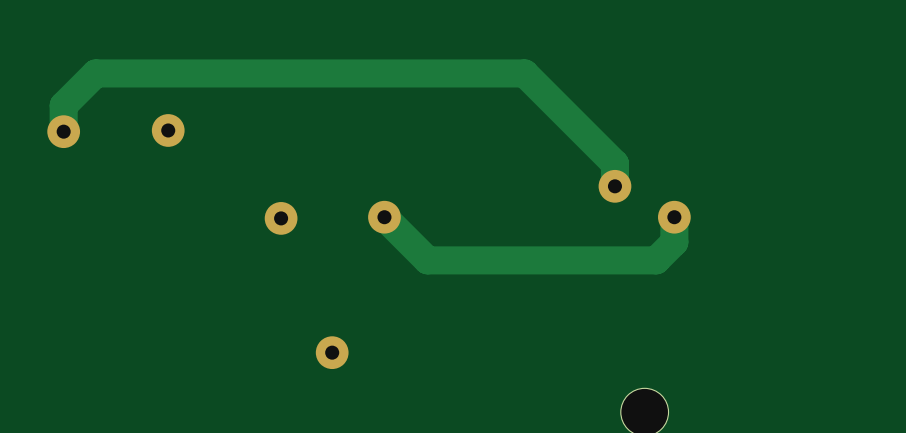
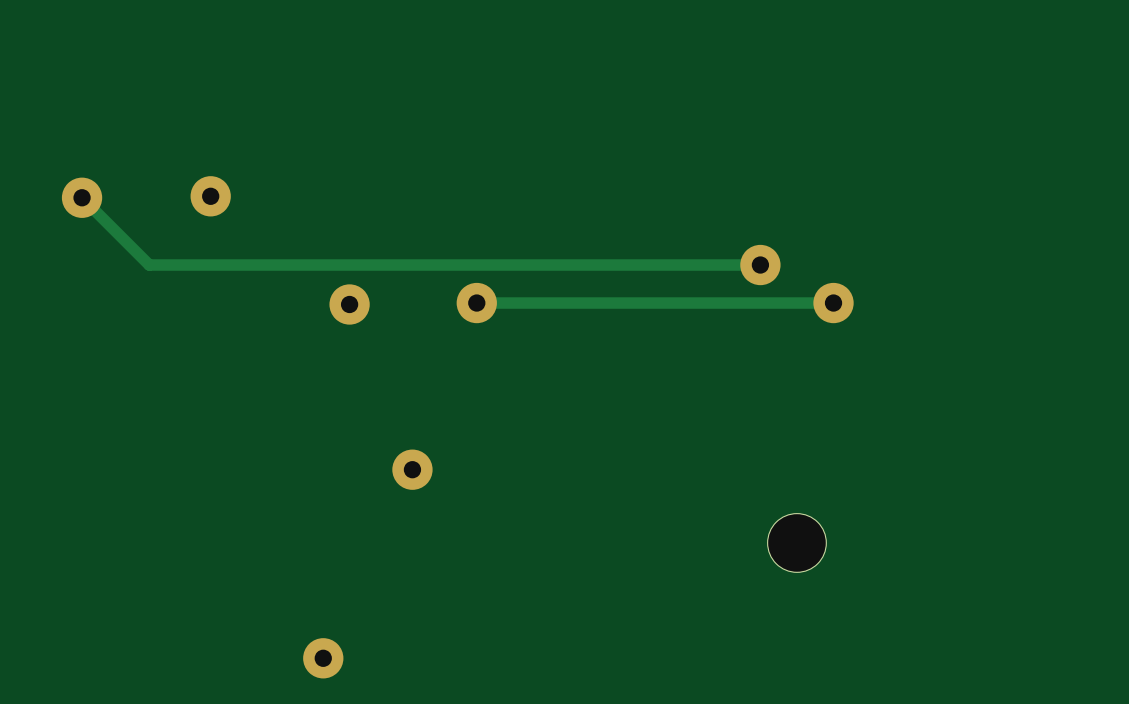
track: (63, 131) (63, 105) (95, 73) (524, 73) (614, 163) (614, 186) -> (82, 197) (149, 265) (760, 265)
track: (674, 217) (674, 242) (656, 260) (427, 260) (384, 217) -> (833, 303) (476, 303)

